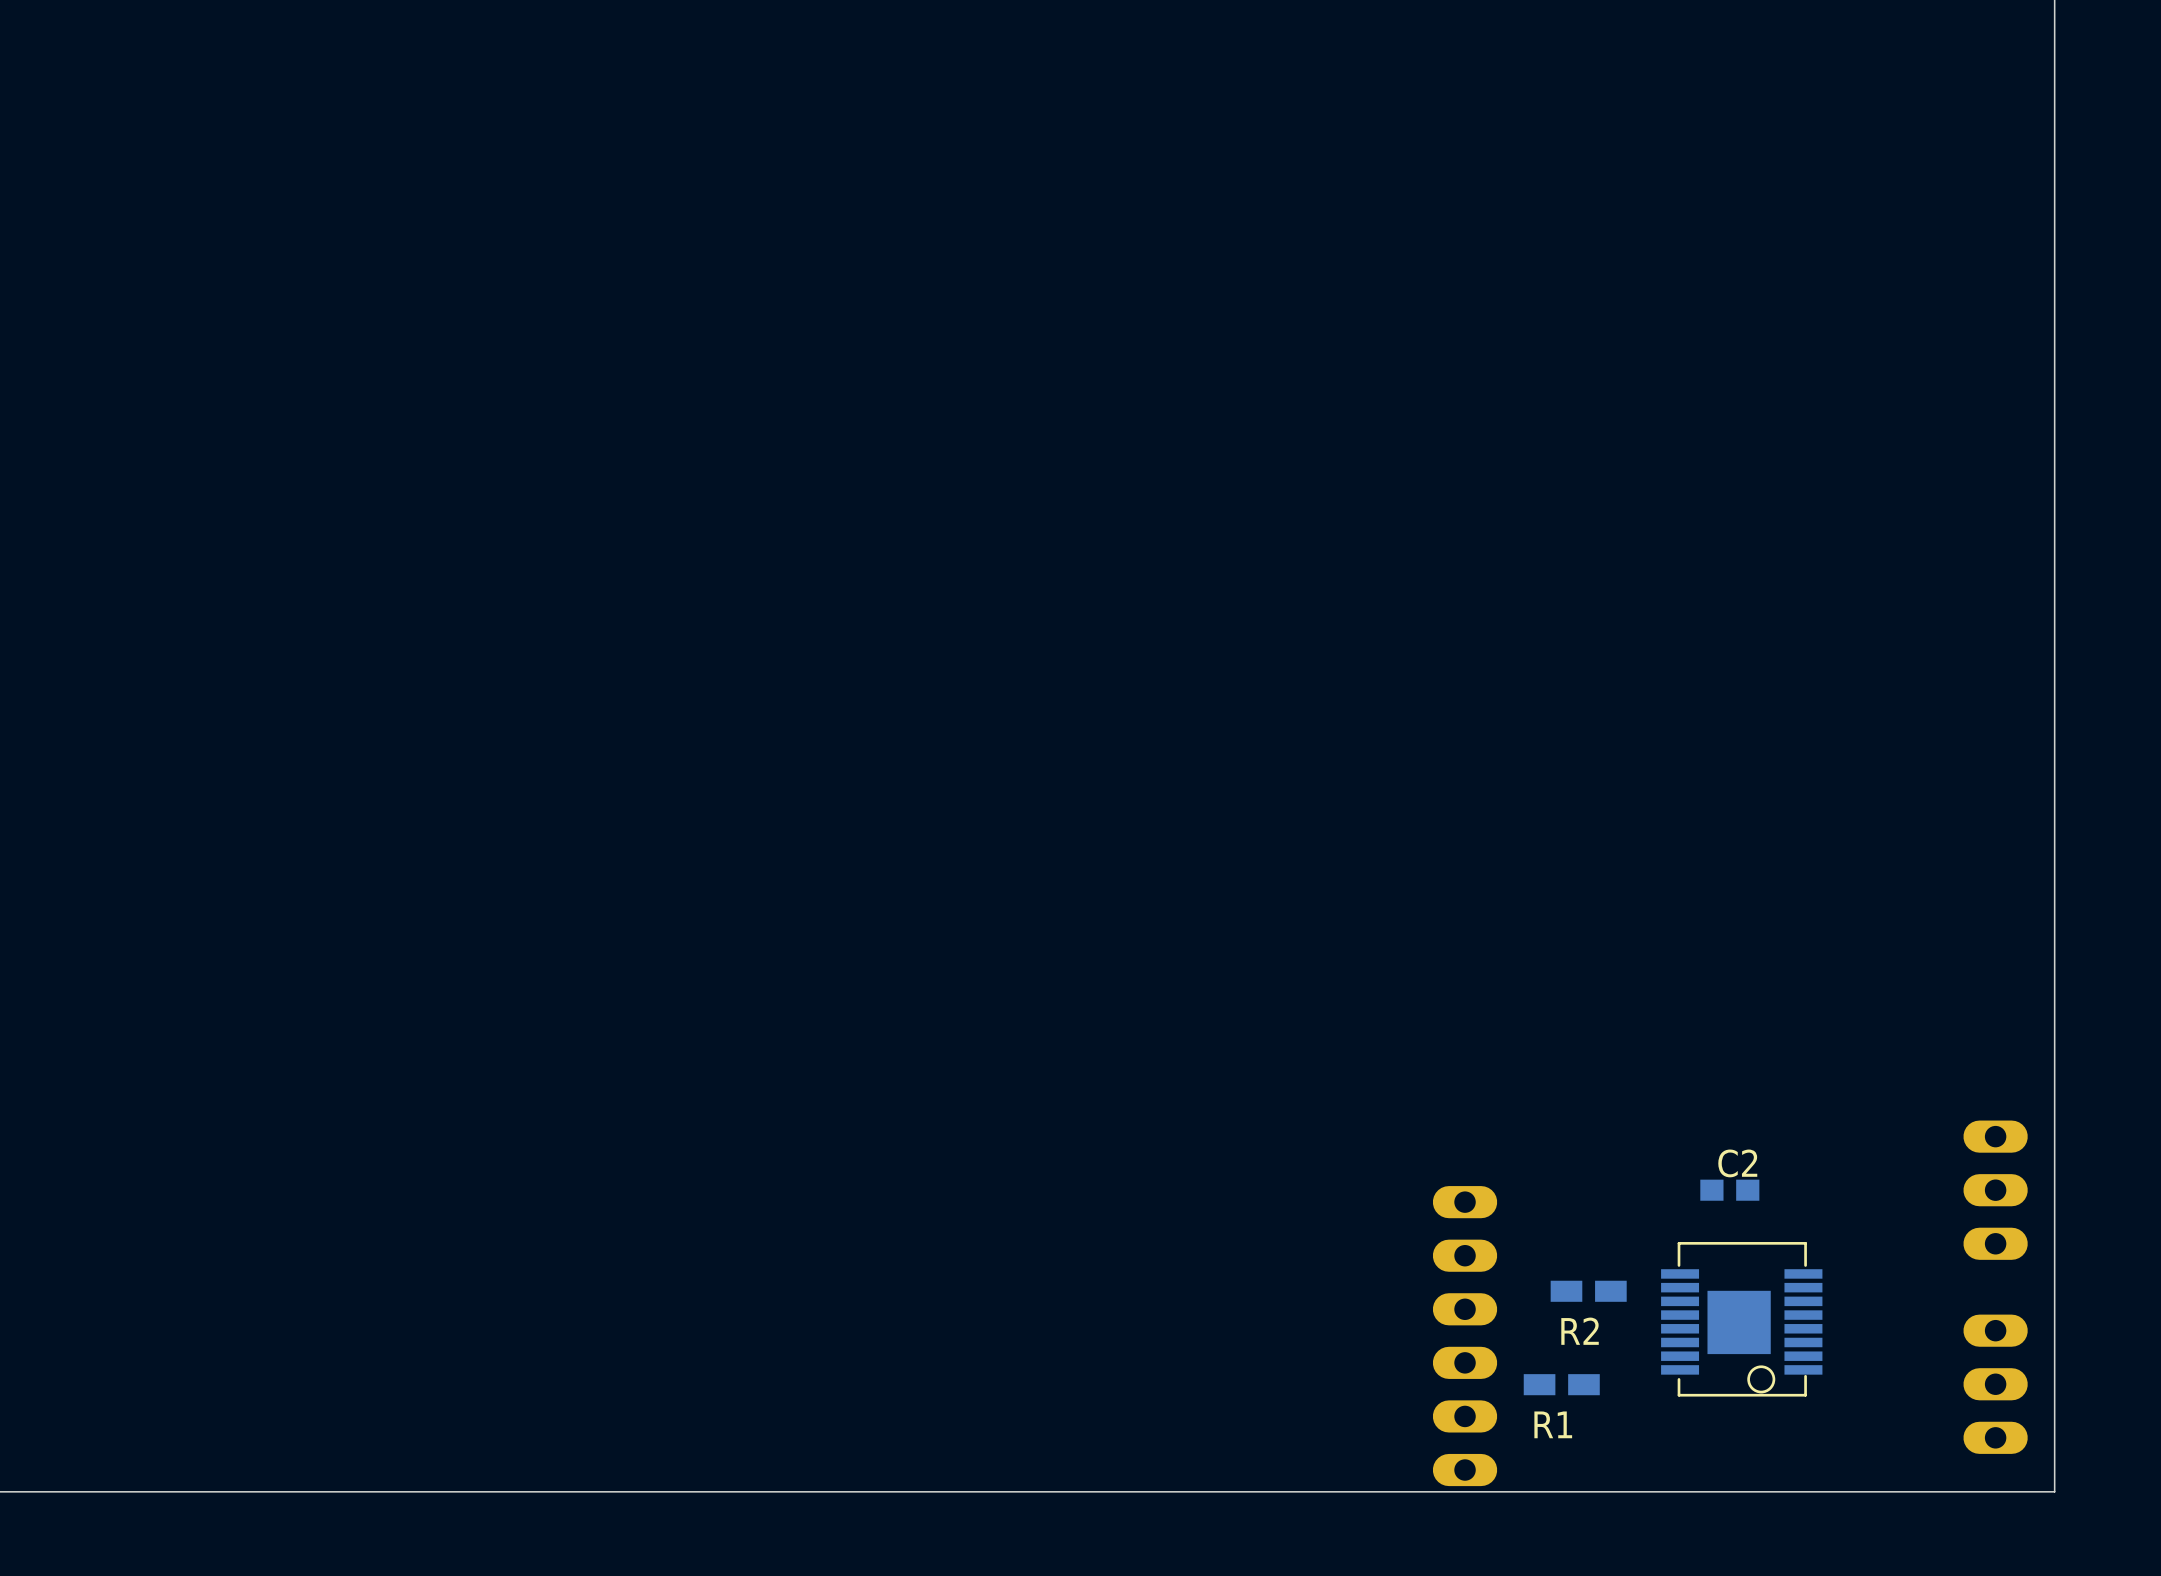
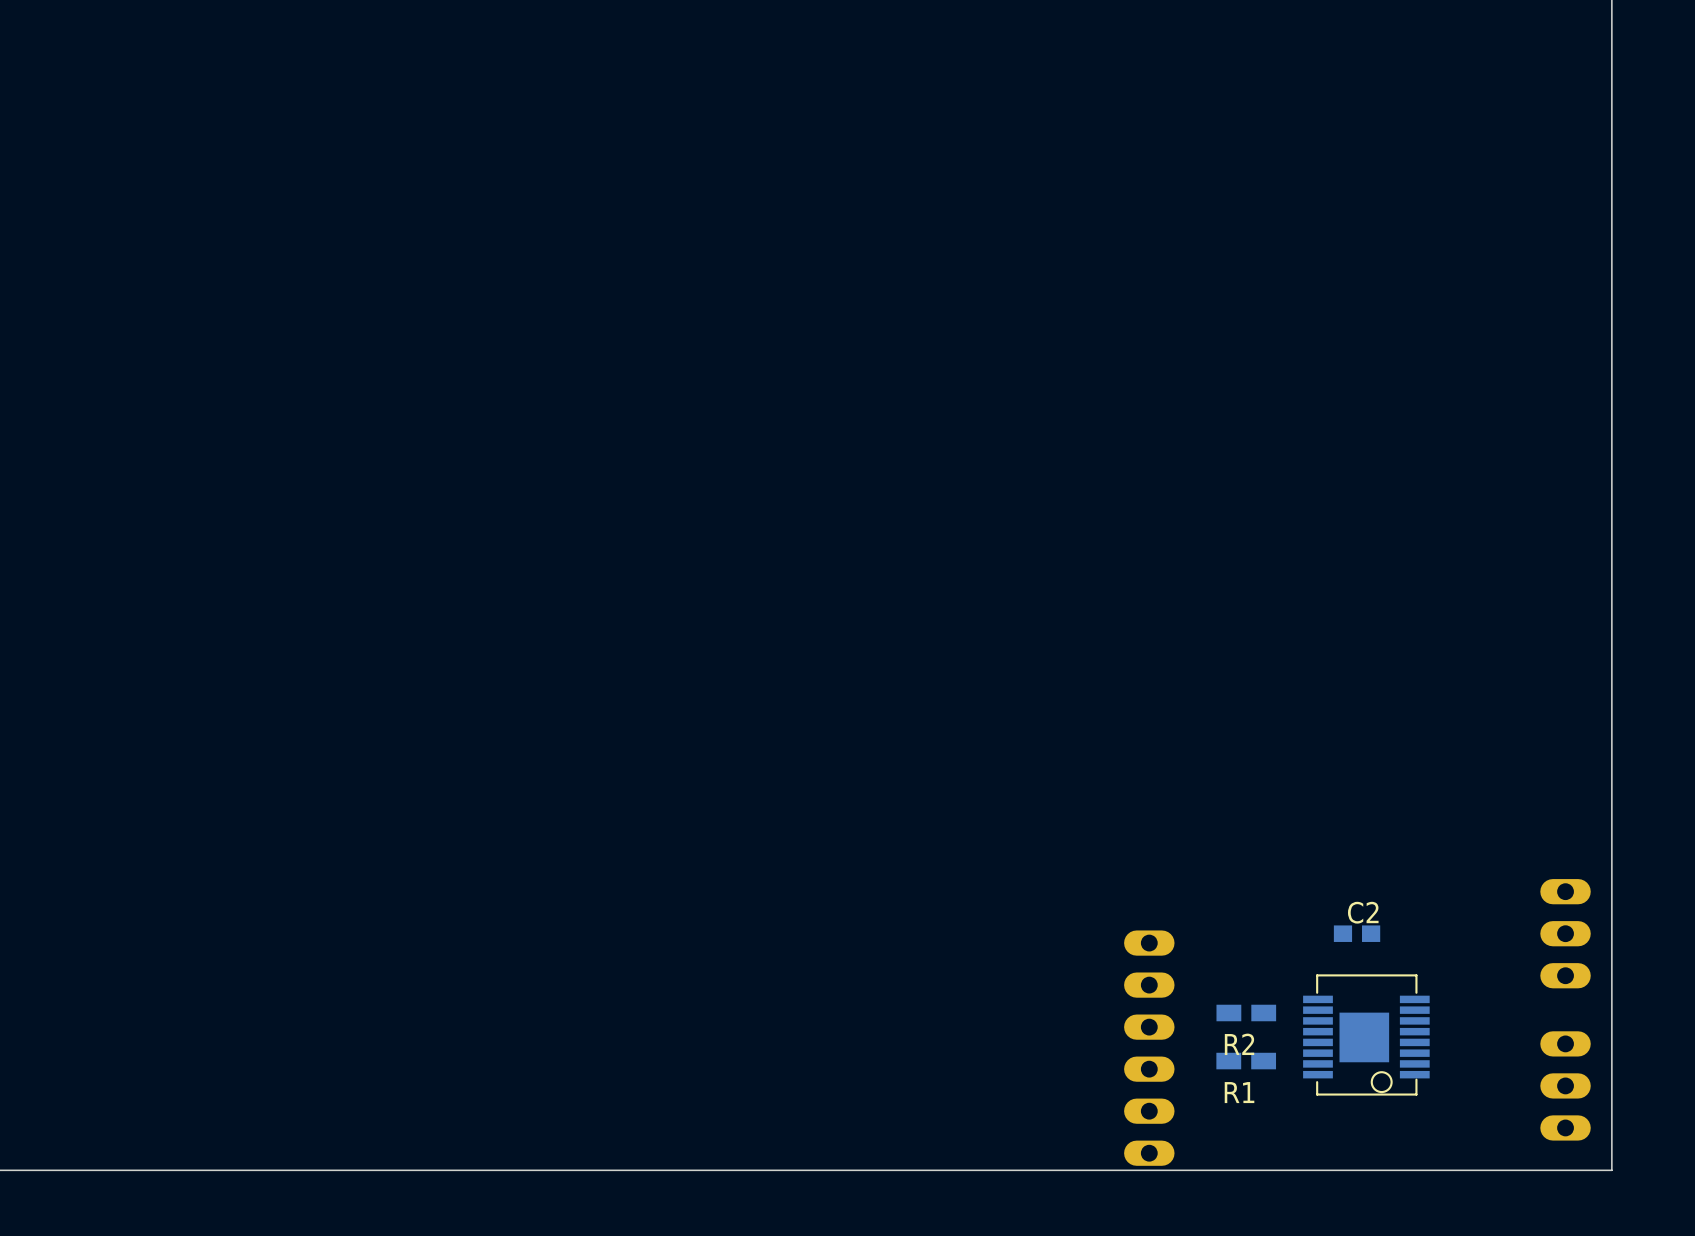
R1 position: (1561, 1384) -> (1246, 1061)

